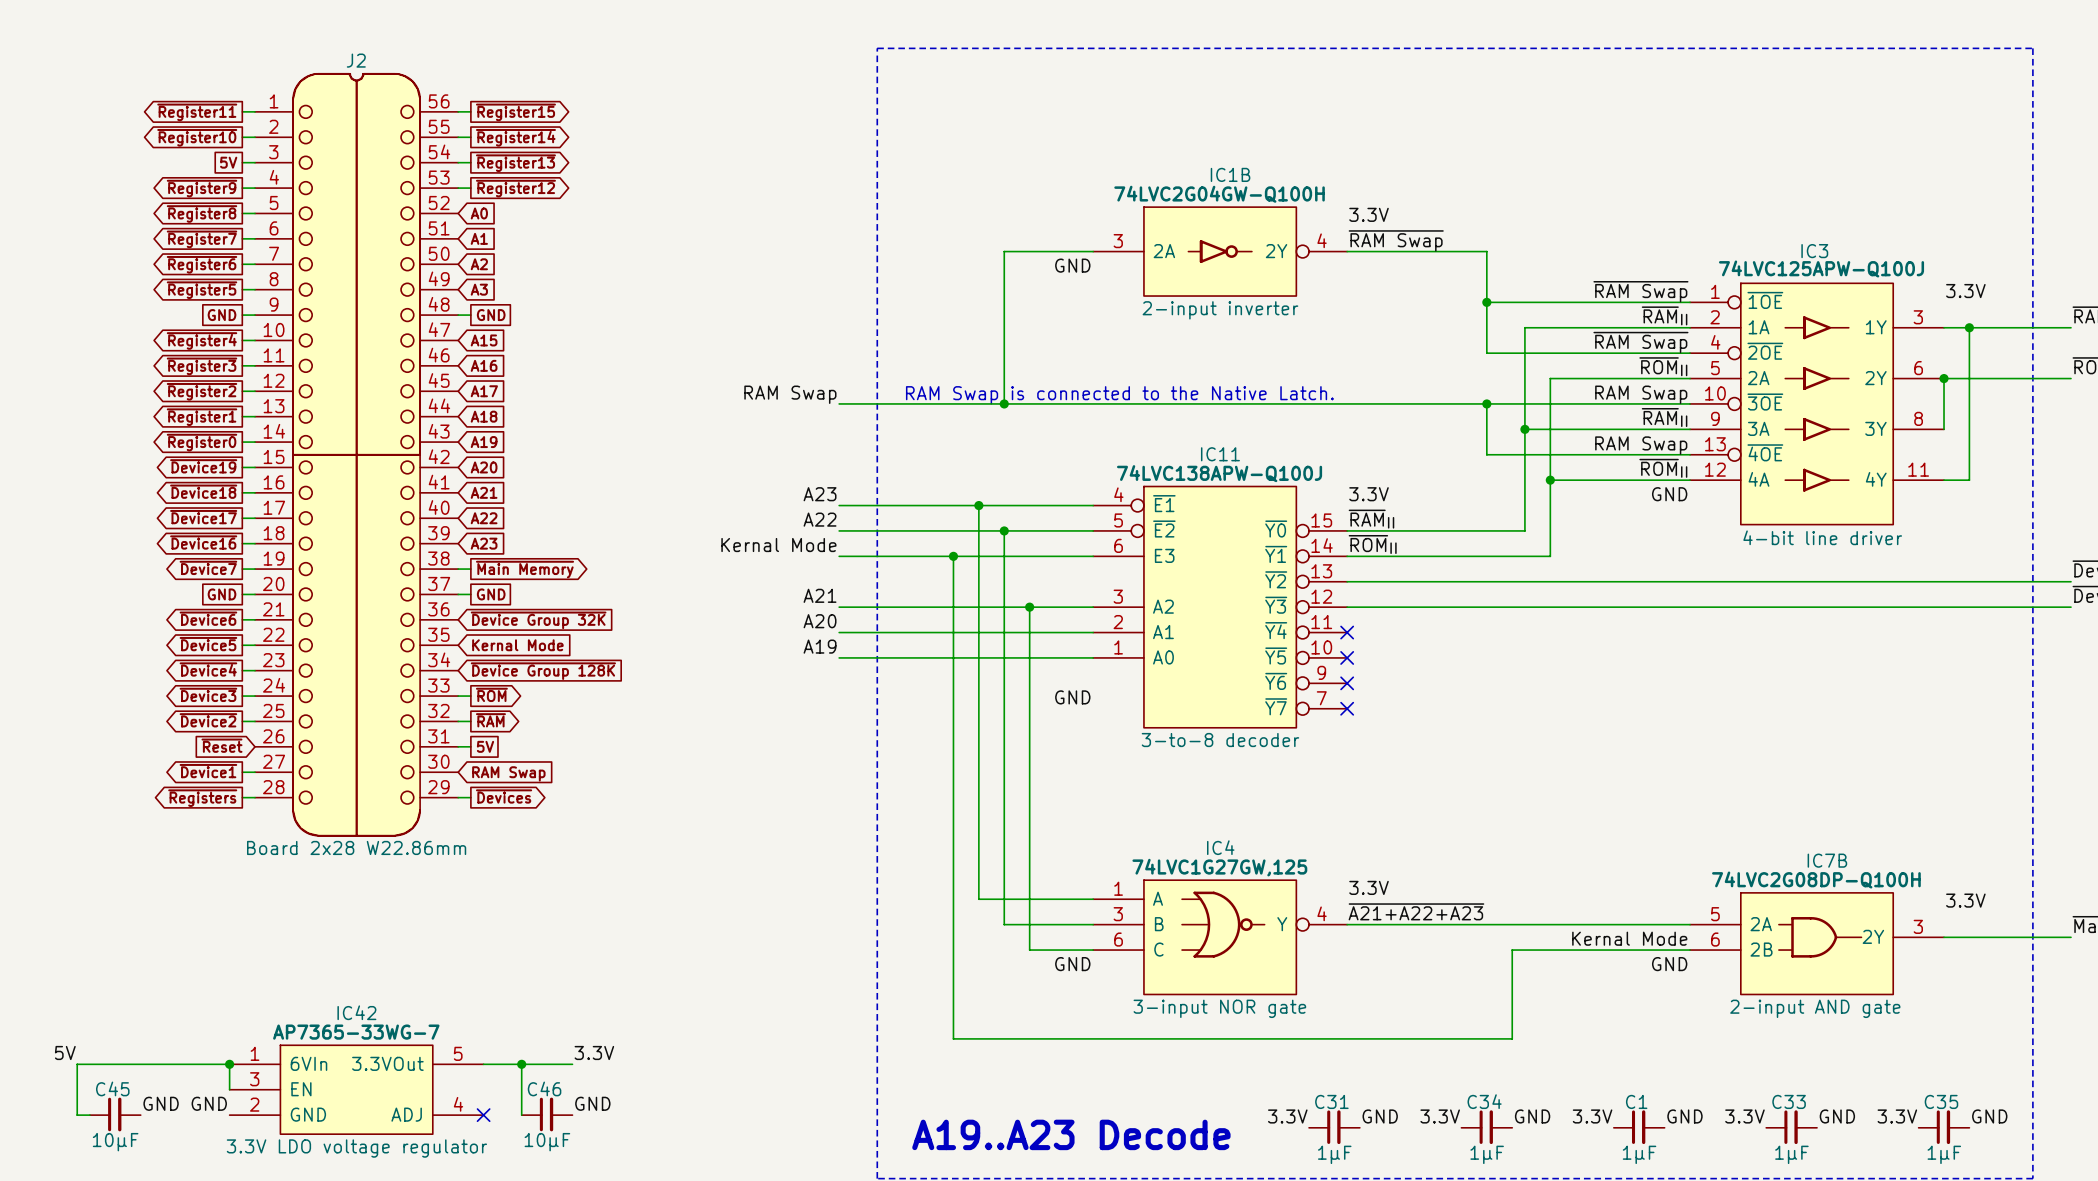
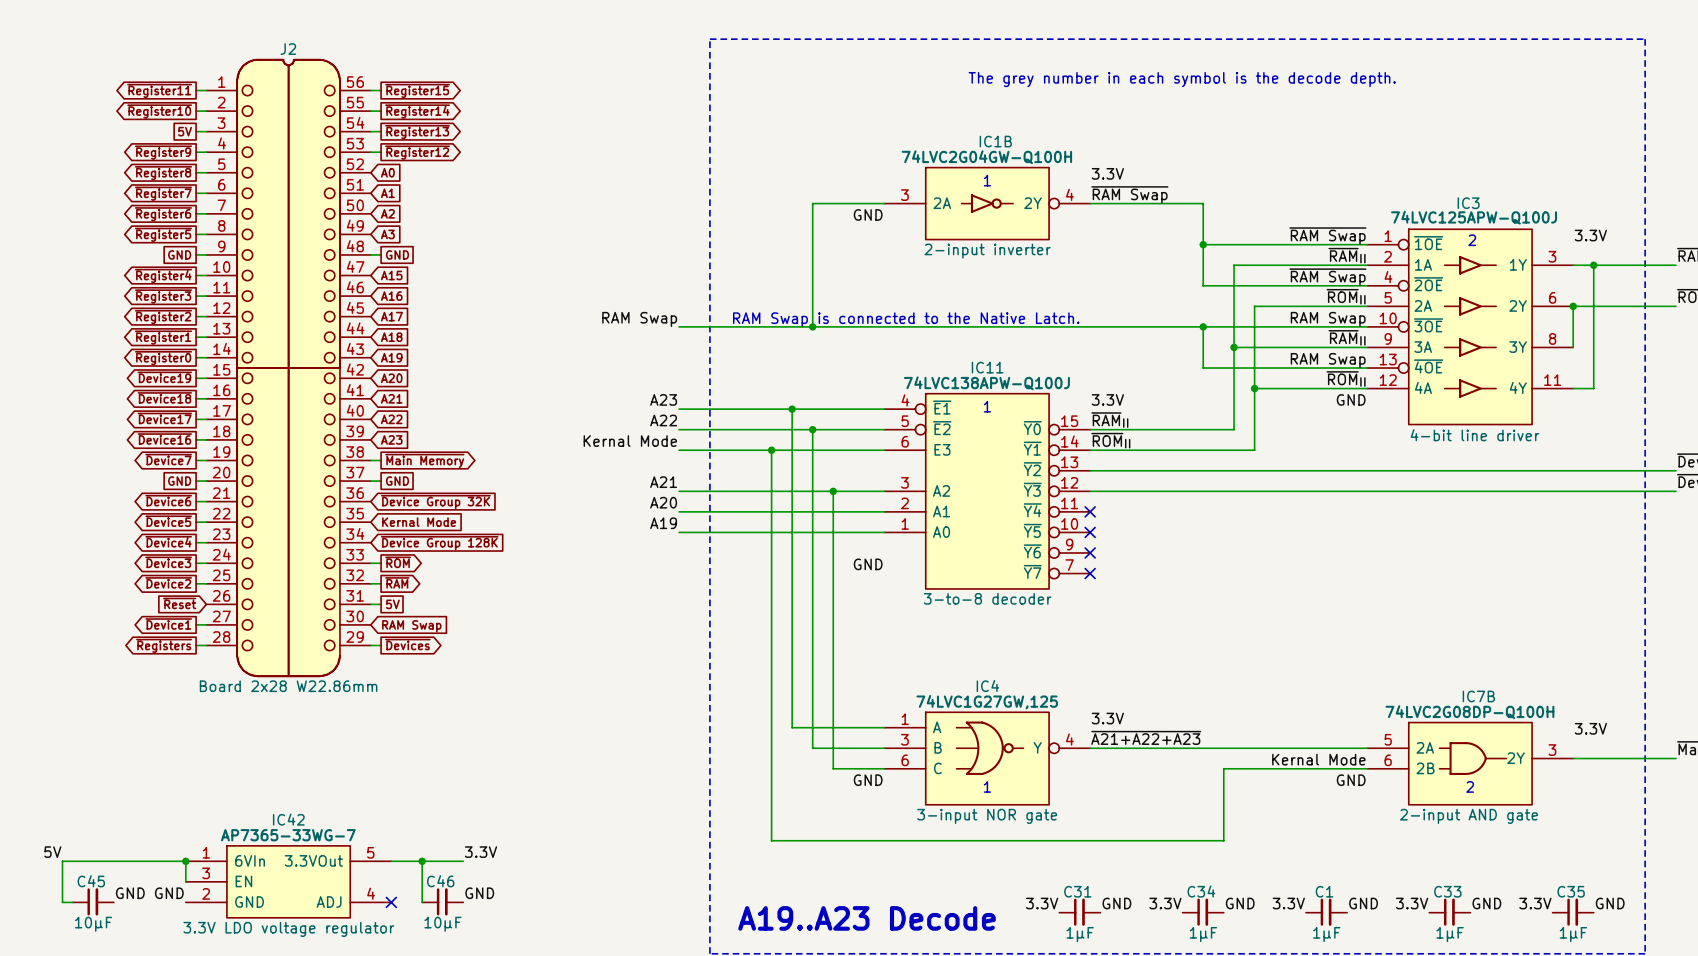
text: none -> The grey number in each symbol is the decode depth. (1182, 79)
text: none -> 1 (987, 180)
text: none -> 2 (1472, 240)
text: none -> 1 (987, 406)
text: none -> 1 (987, 786)
text: none -> 2 (1470, 786)

